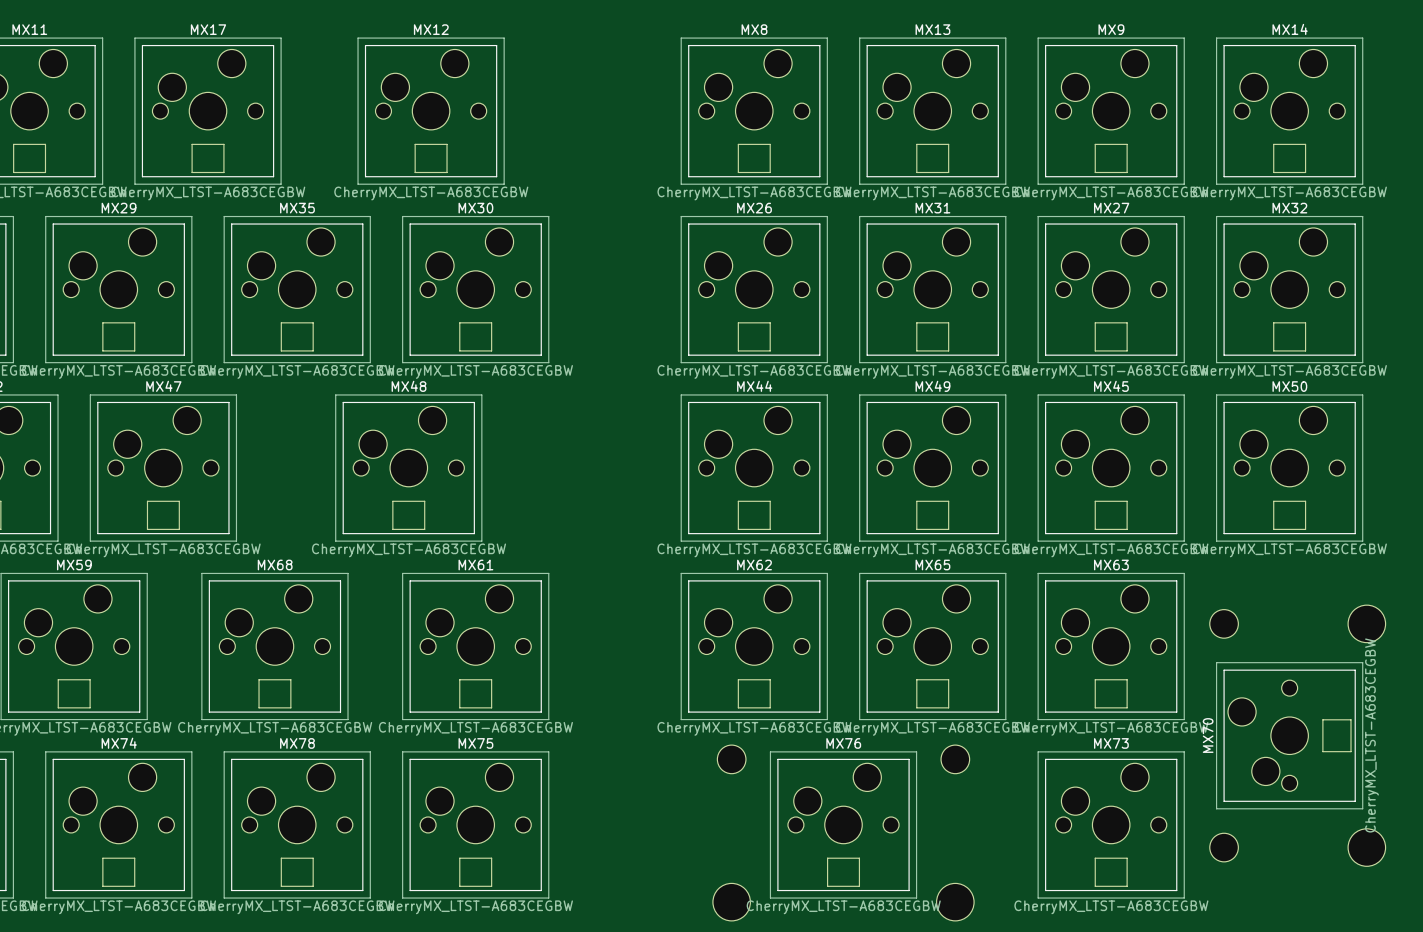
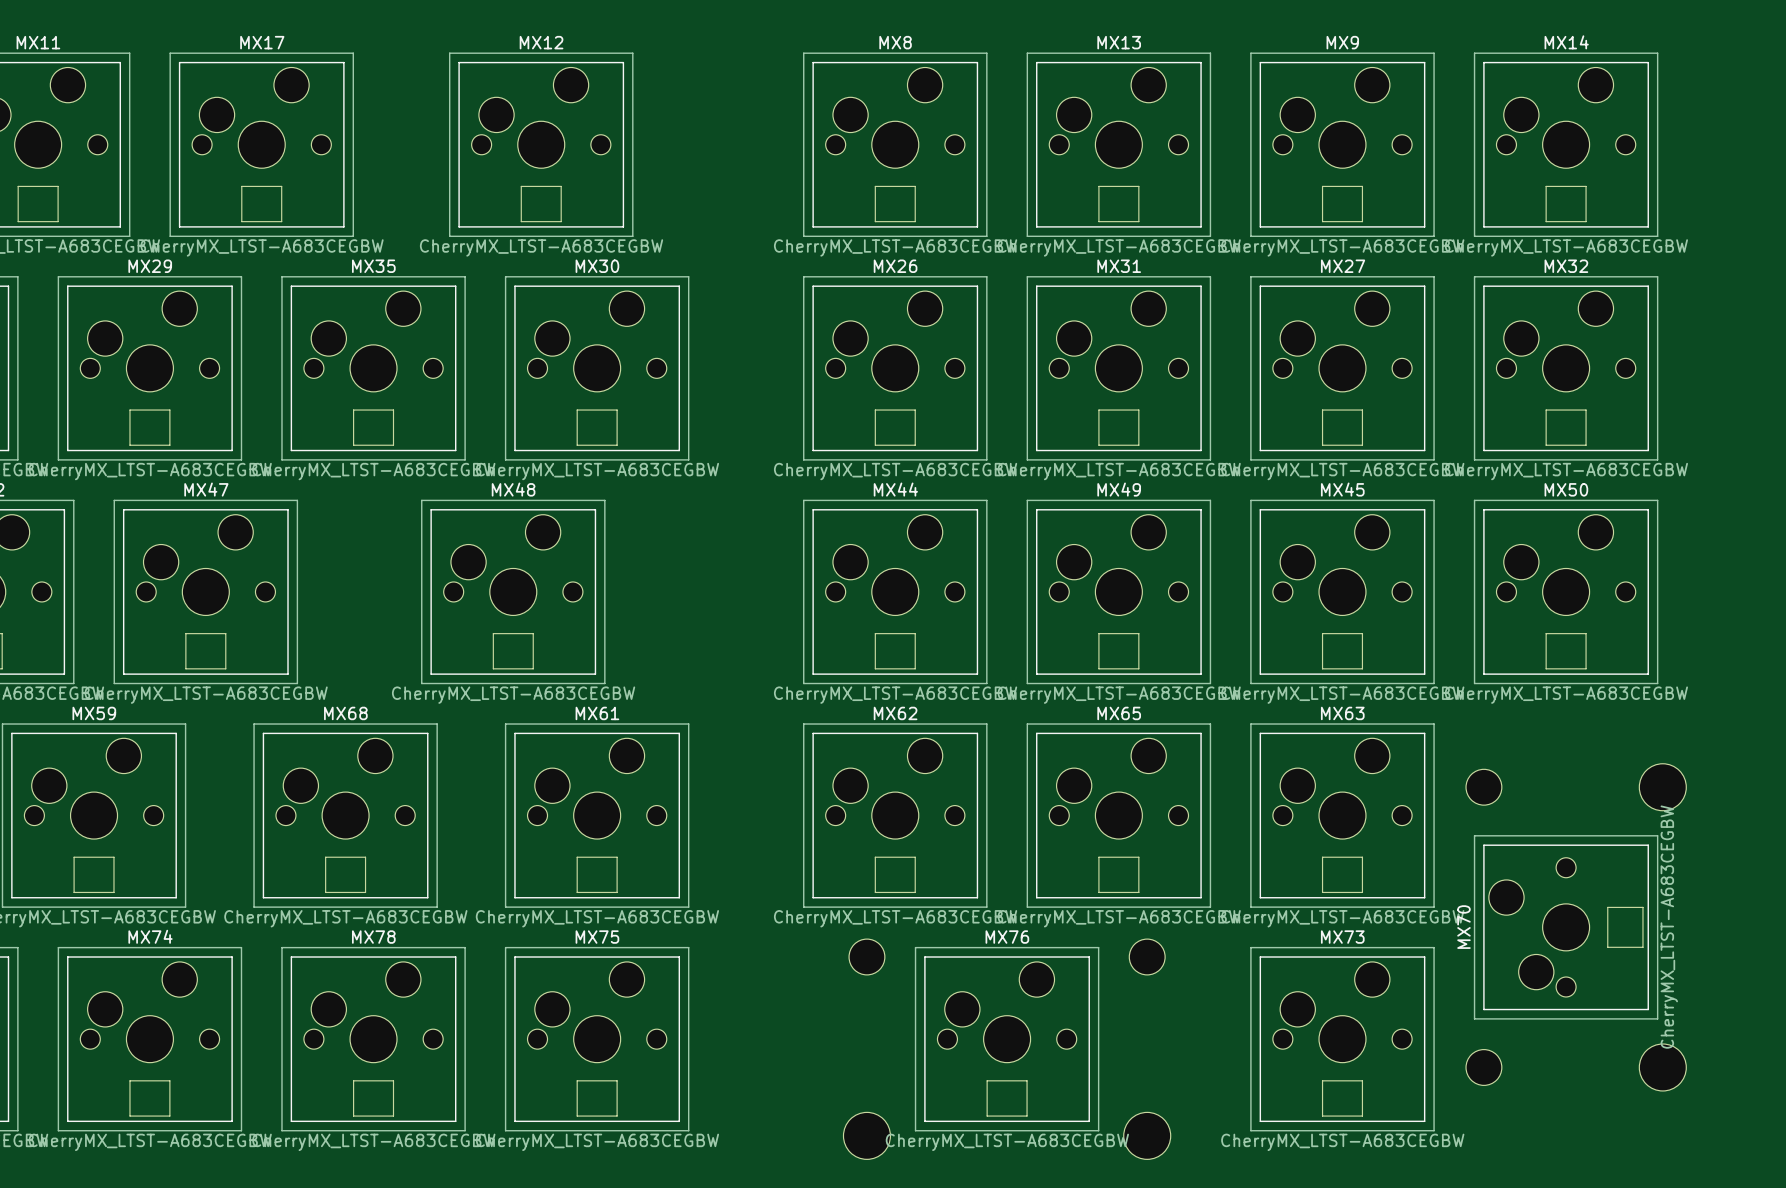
MX8 position: (754, 111) -> (895, 144)
MX13 position: (932, 111) -> (1118, 144)
MX9 position: (1111, 111) -> (1342, 144)
MX14 position: (1289, 111) -> (1566, 144)
MX26 position: (754, 289) -> (895, 368)
MX31 position: (932, 289) -> (1118, 368)
MX27 position: (1111, 289) -> (1342, 368)
MX32 position: (1289, 289) -> (1566, 368)
MX44 position: (754, 468) -> (895, 591)
MX49 position: (932, 468) -> (1118, 591)
MX45 position: (1111, 468) -> (1342, 591)
MX50 position: (1289, 468) -> (1566, 591)
MX62 position: (754, 646) -> (895, 815)
MX65 position: (932, 646) -> (1118, 815)
MX63 position: (1111, 646) -> (1342, 815)
MX70 position: (1297, 735) -> (1576, 927)
MX73 position: (1111, 824) -> (1342, 1039)
MX76 position: (843, 832) -> (1007, 1049)

